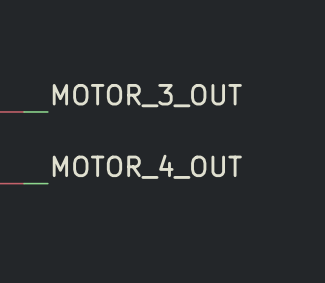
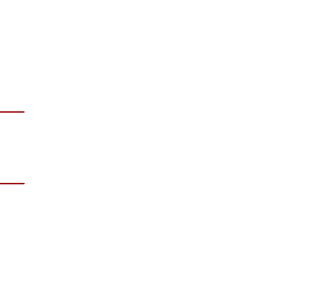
label: MOTOR_3_OUT (147, 95) -> none
wire: (24, 111) (47, 111) -> none
label: MOTOR_4_OUT (147, 166) -> none
wire: (24, 183) (47, 183) -> none

